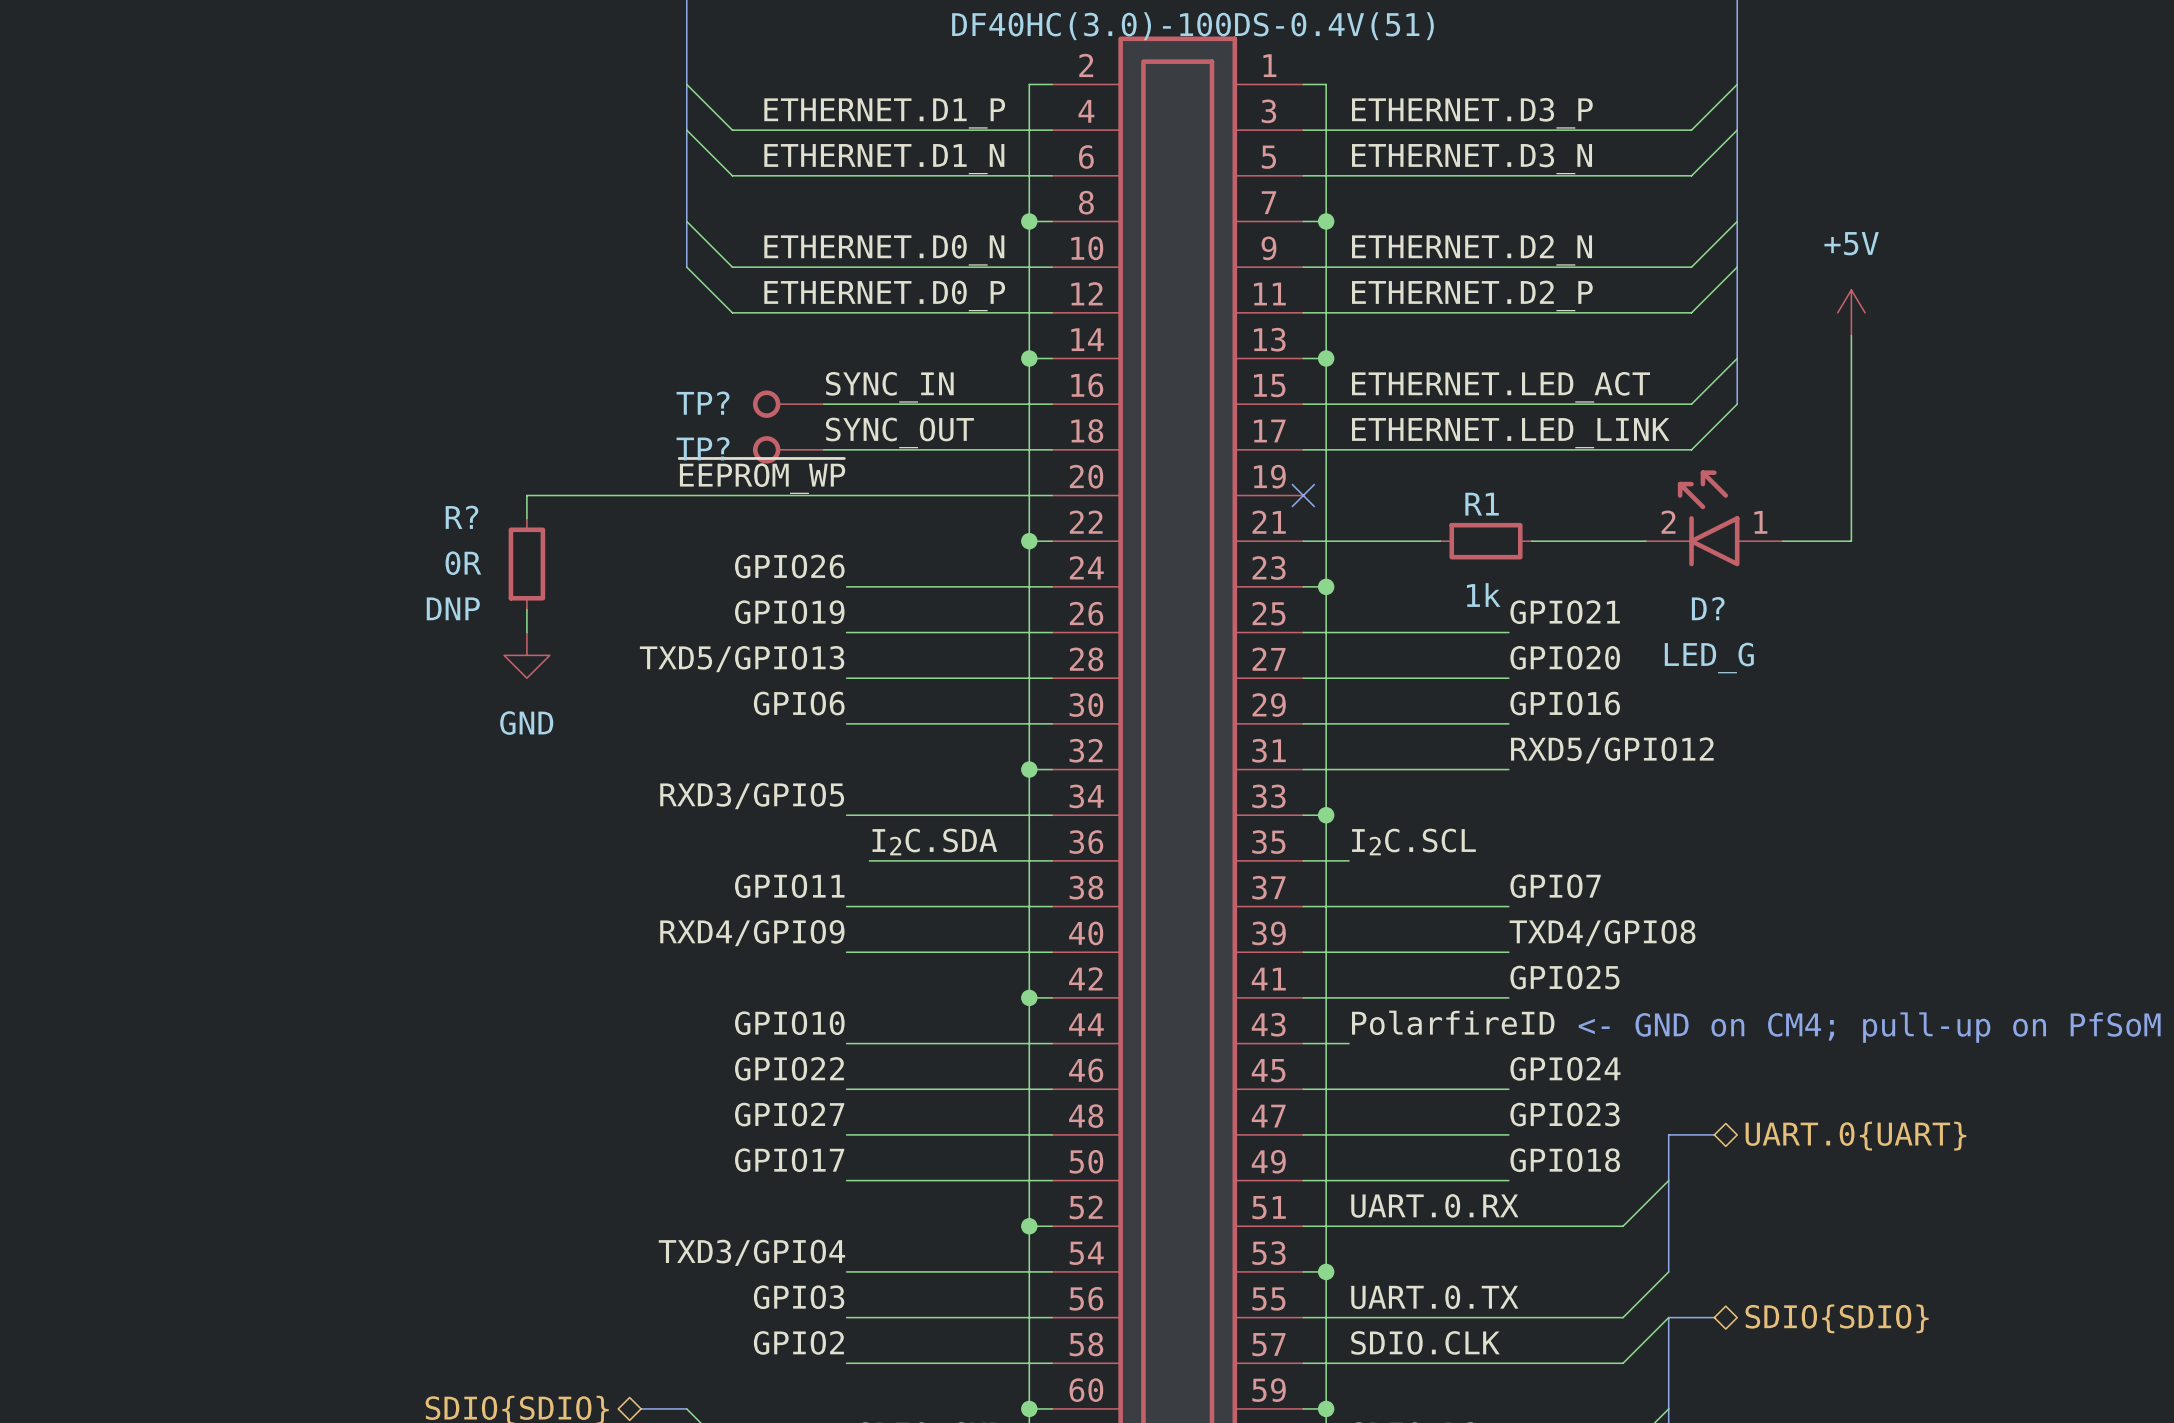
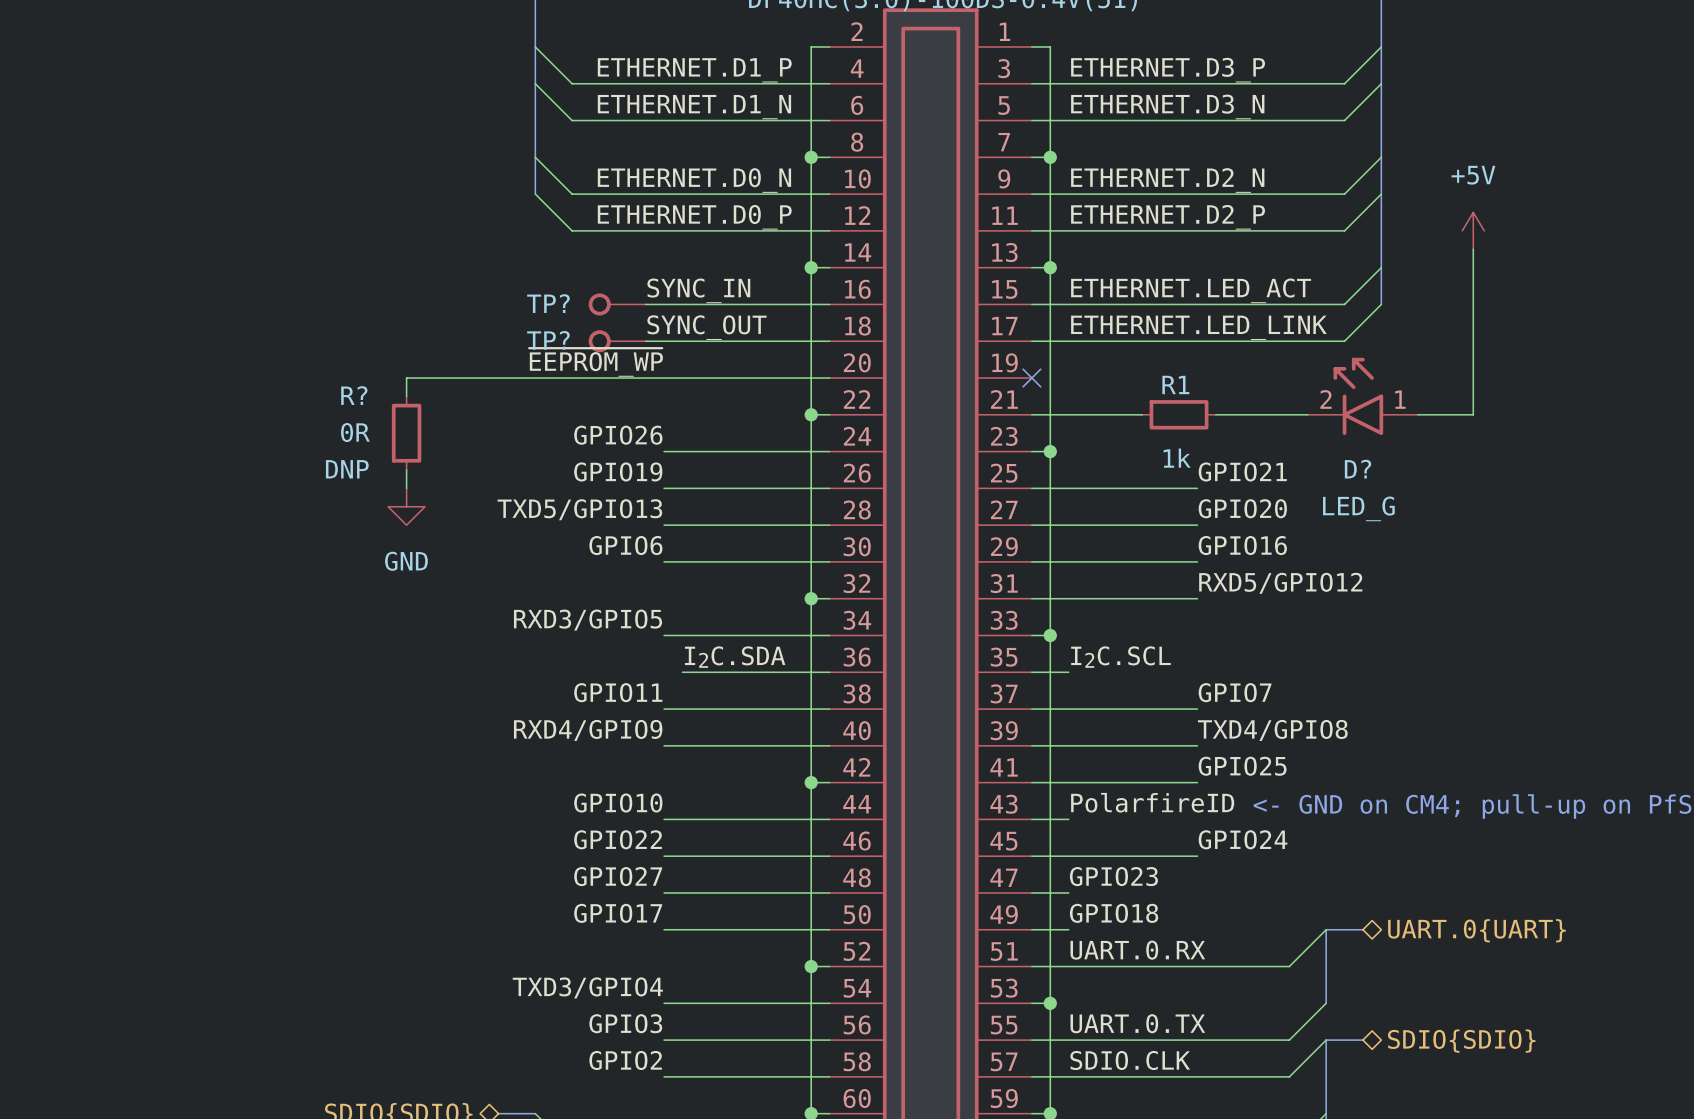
label position: GPIO23 (1565, 1114) -> GPIO23 (1113, 876)
wire: (1349, 1134) (1508, 1134) -> none
bus: (1714, 1134) (1668, 1134) (1668, 1180) -> (1362, 929) (1326, 929)
hierarchical label position: UART.0{UART} (1855, 1136) -> UART.0{UART} (1476, 930)
label position: GPIO18 (1565, 1160) -> GPIO18 (1114, 913)
wire: (1349, 1180) (1508, 1180) -> none

